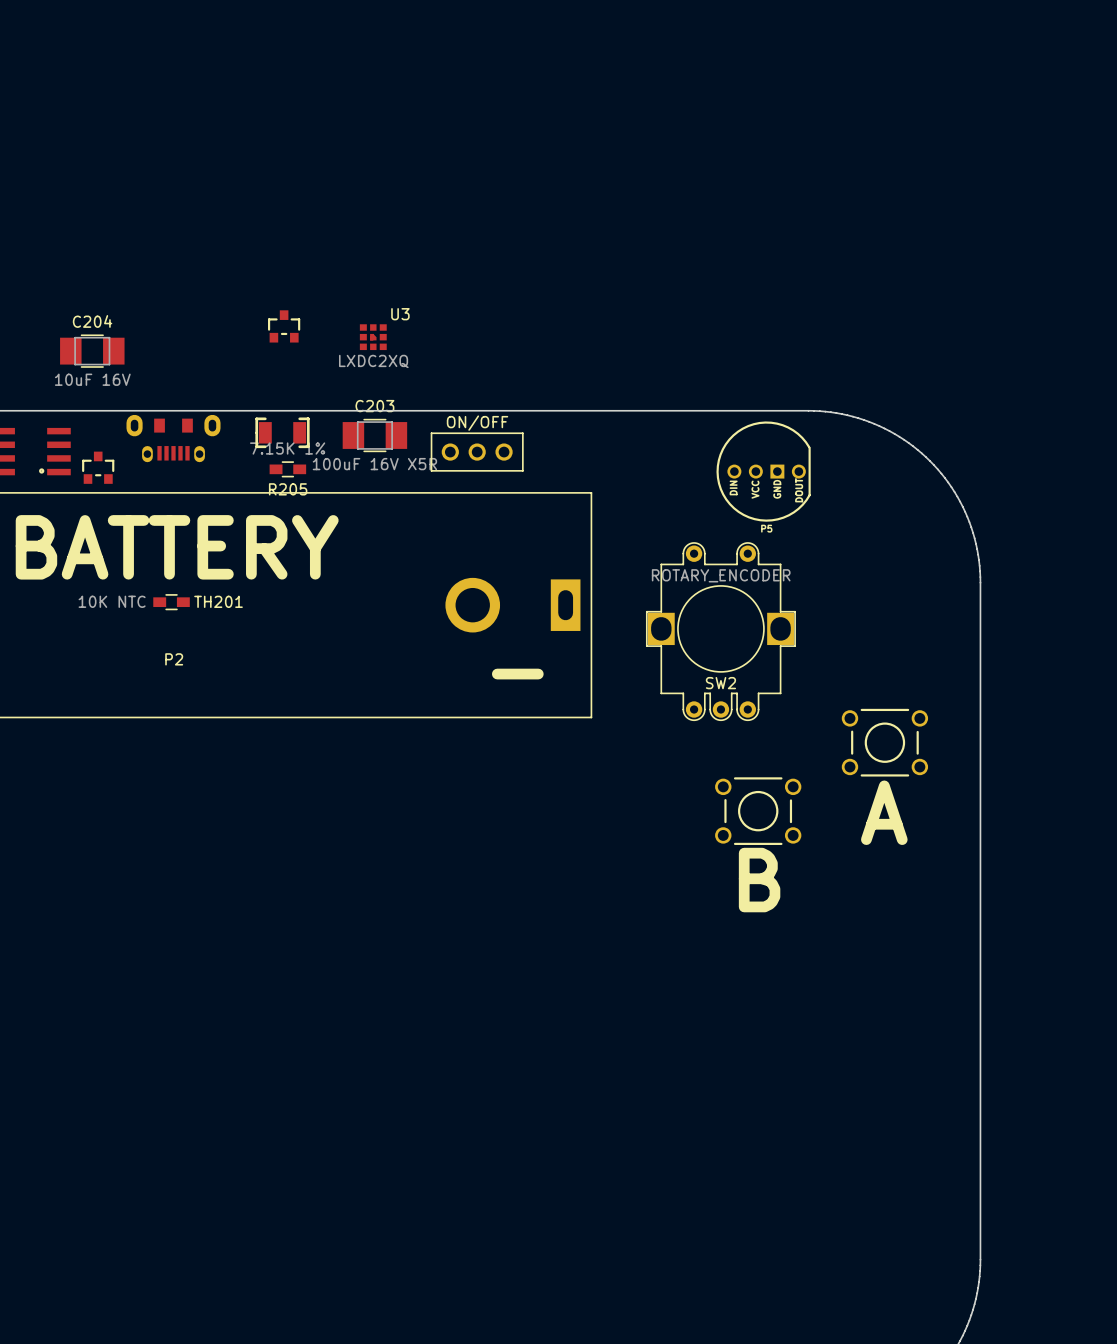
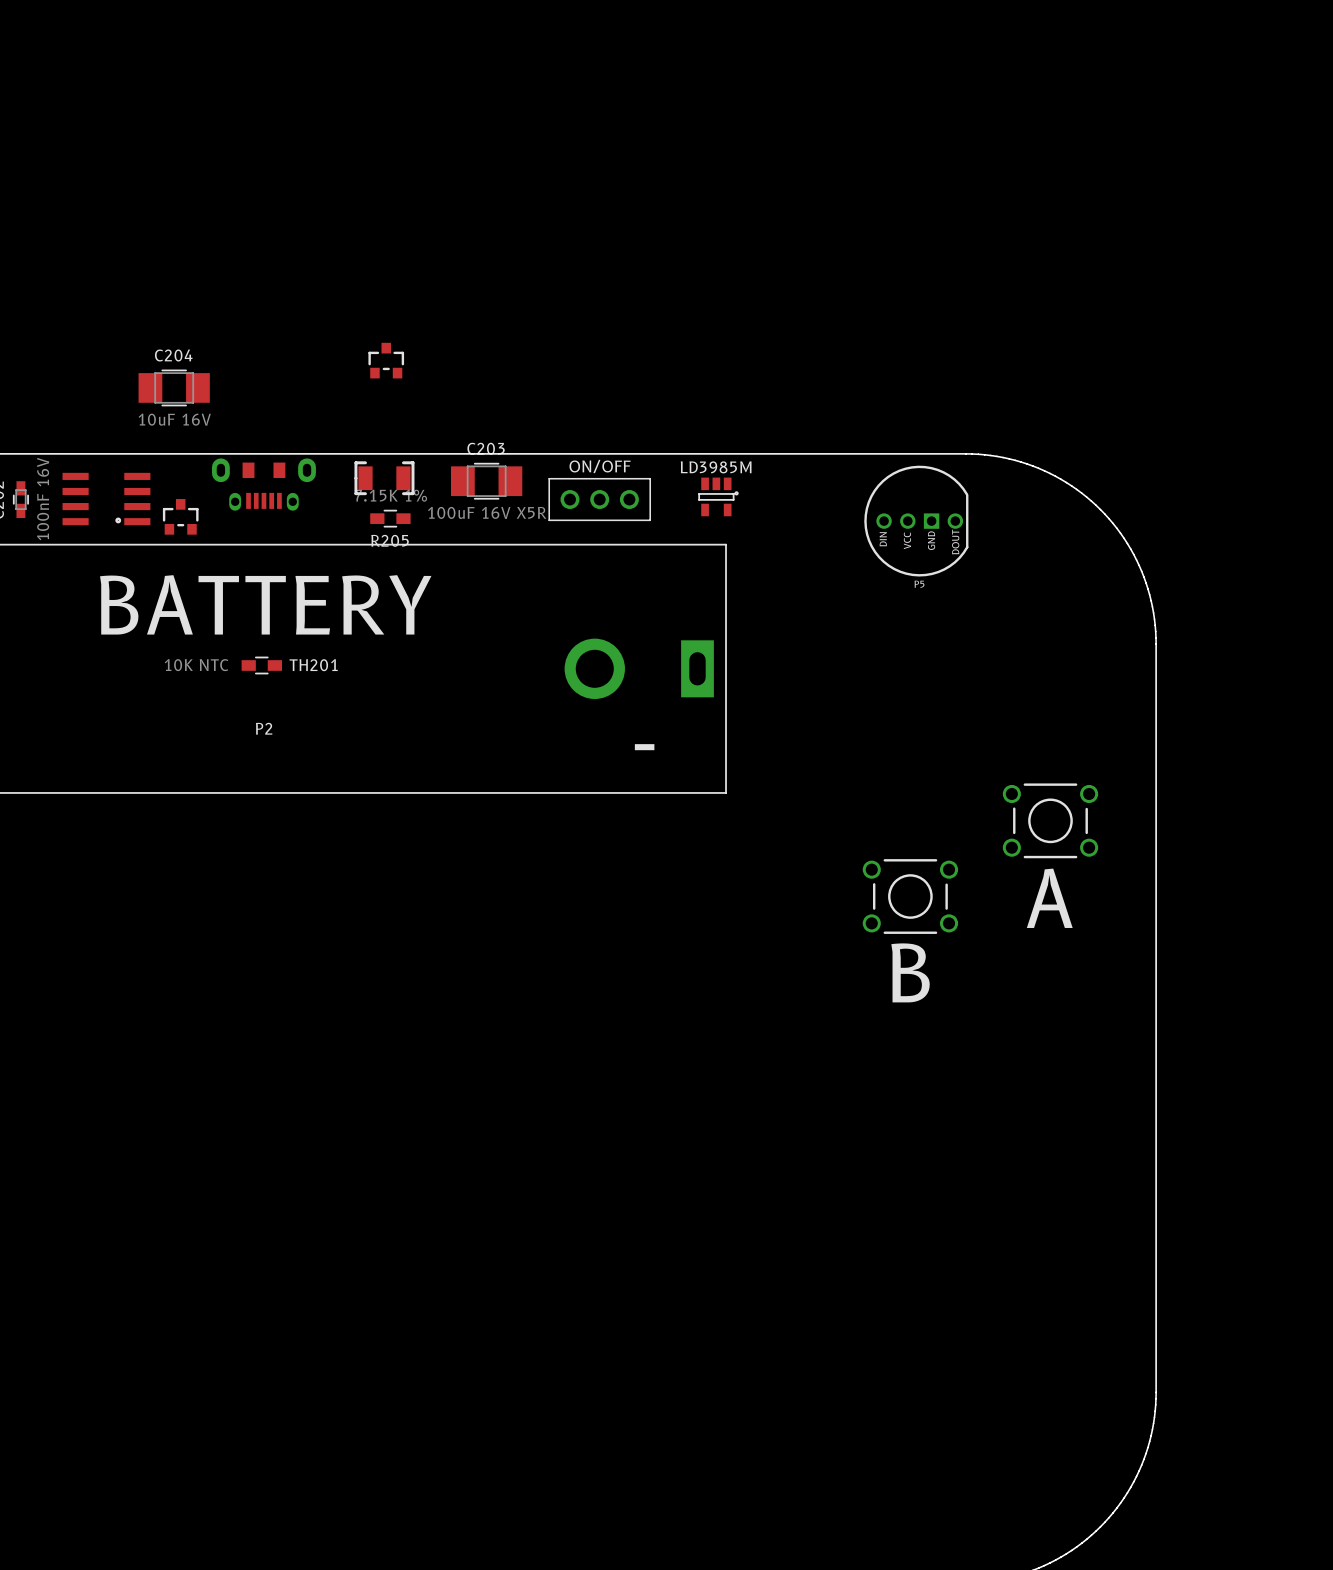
U3: LXDC2XQ (373, 337) -> none
part: none -> LD3985M (718, 496)
SW2: ROTARY_ENCODER (720, 631) -> none

